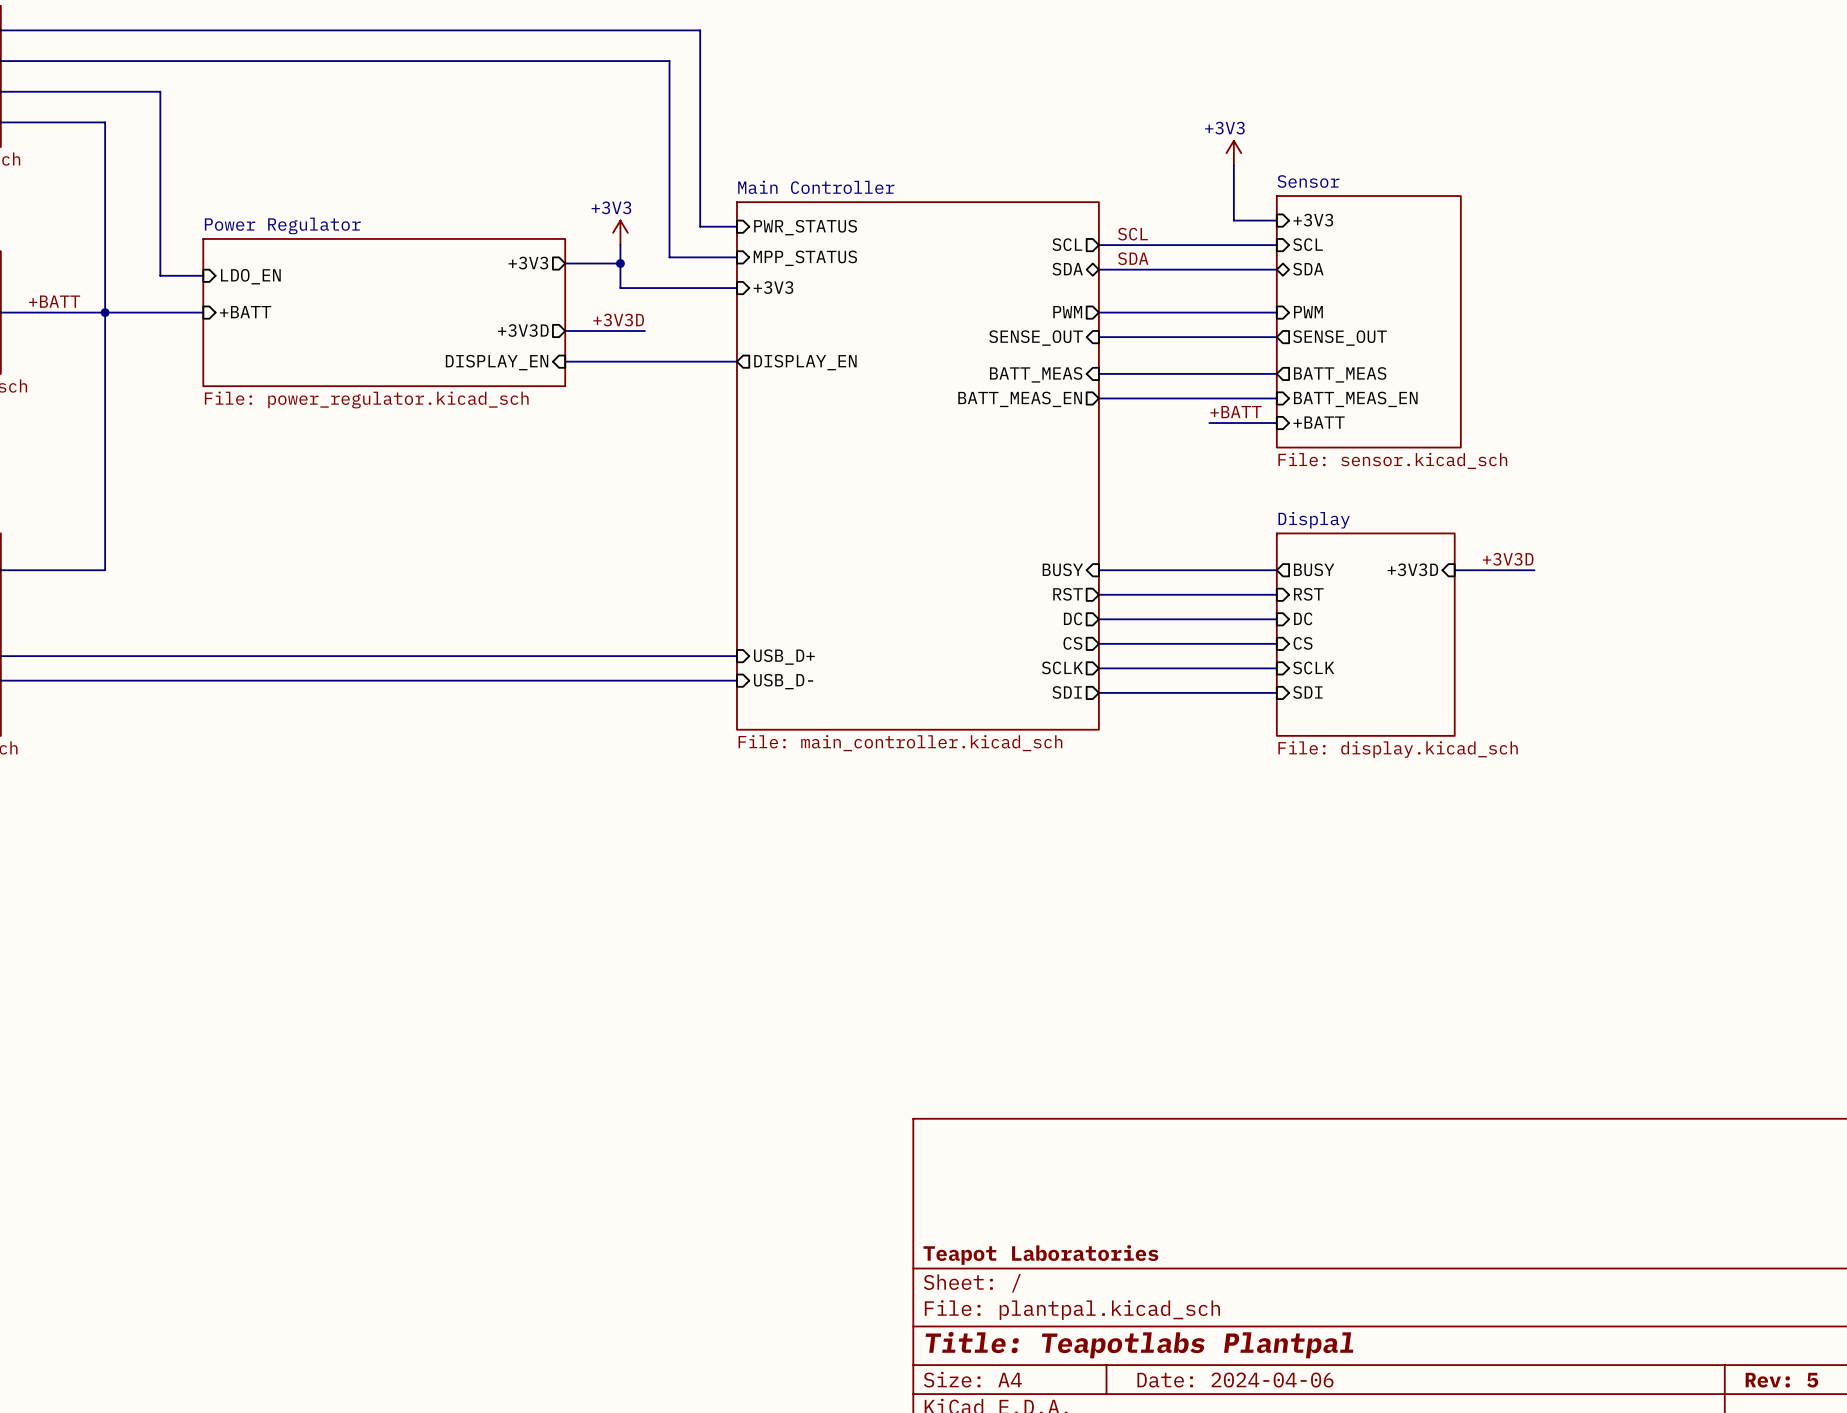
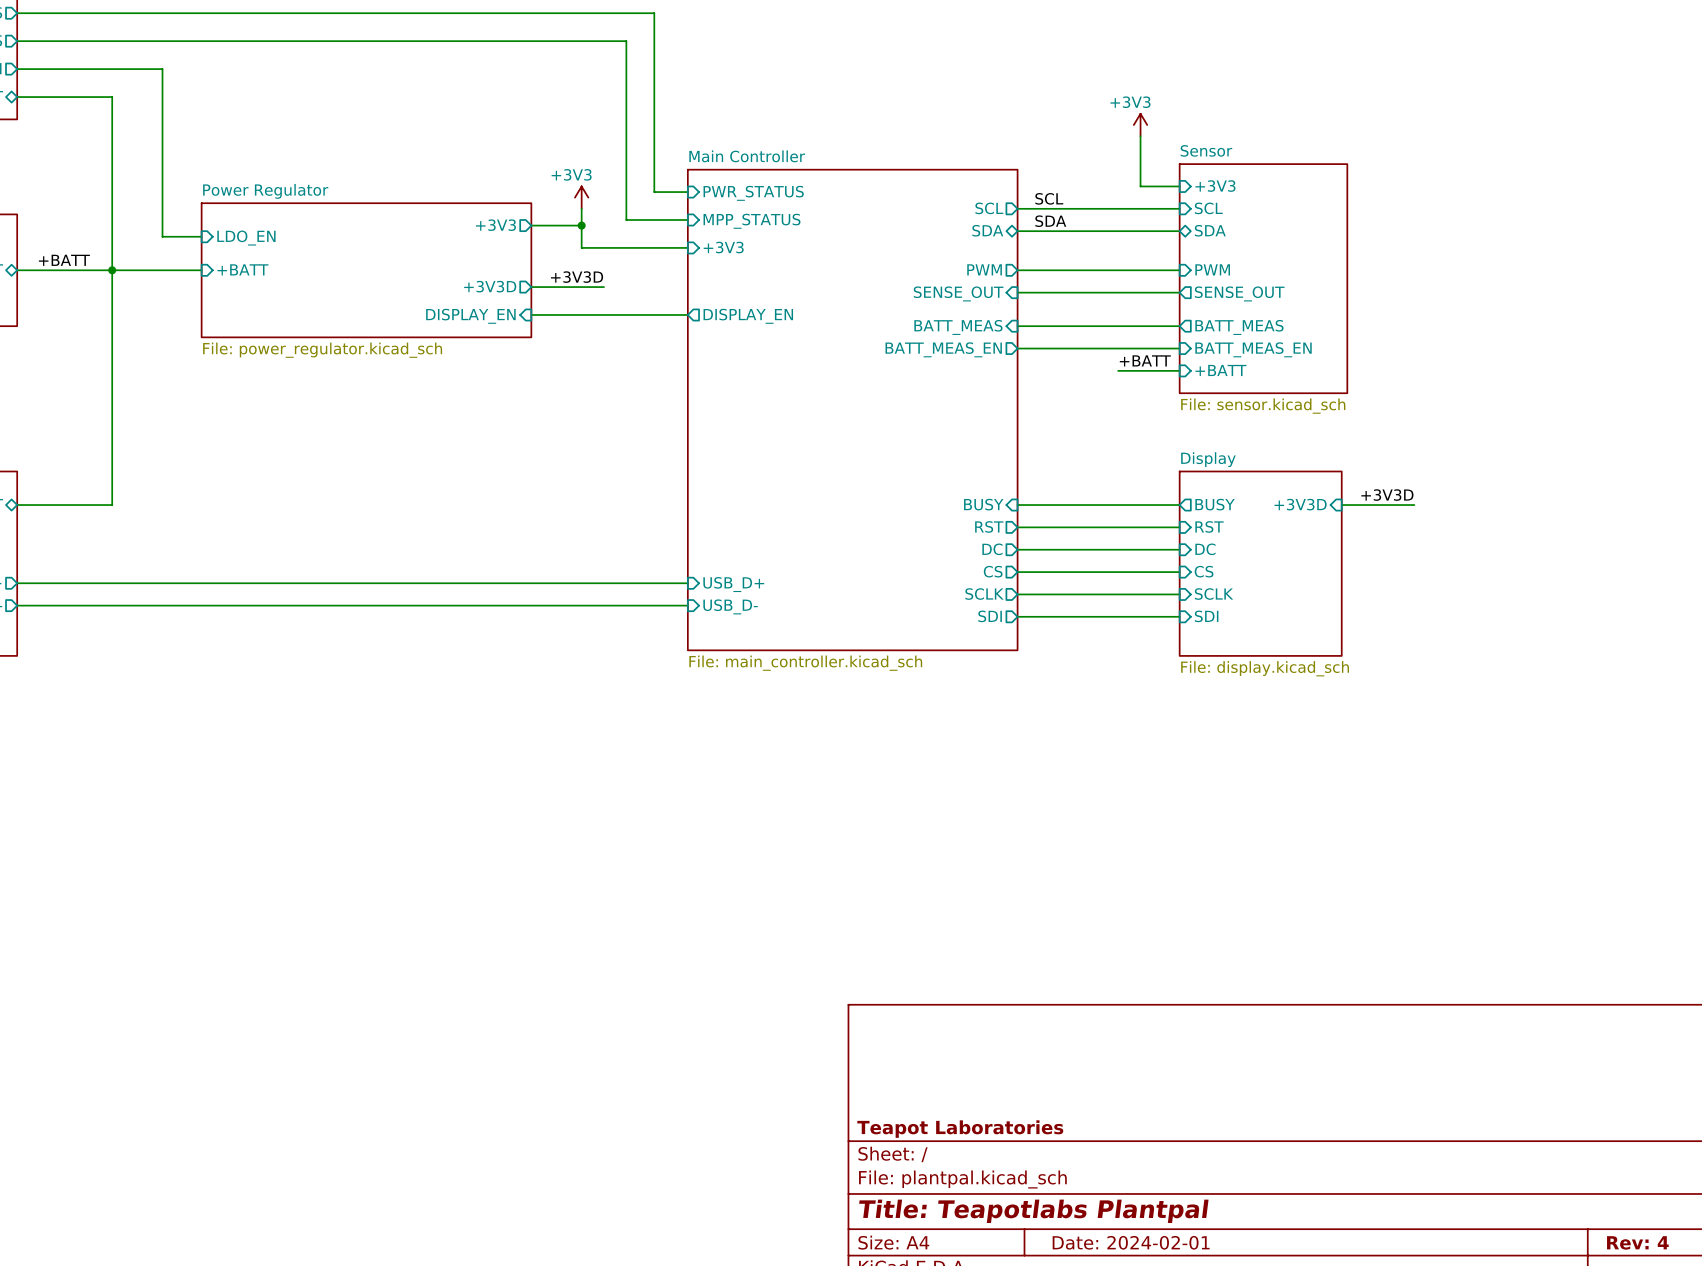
title block: Date: 2024-04-06 (1235, 1380) -> Date: 2024-02-01 (1131, 1242)
title block: Rev: 5 (1781, 1380) -> Rev: 4 (1637, 1242)

